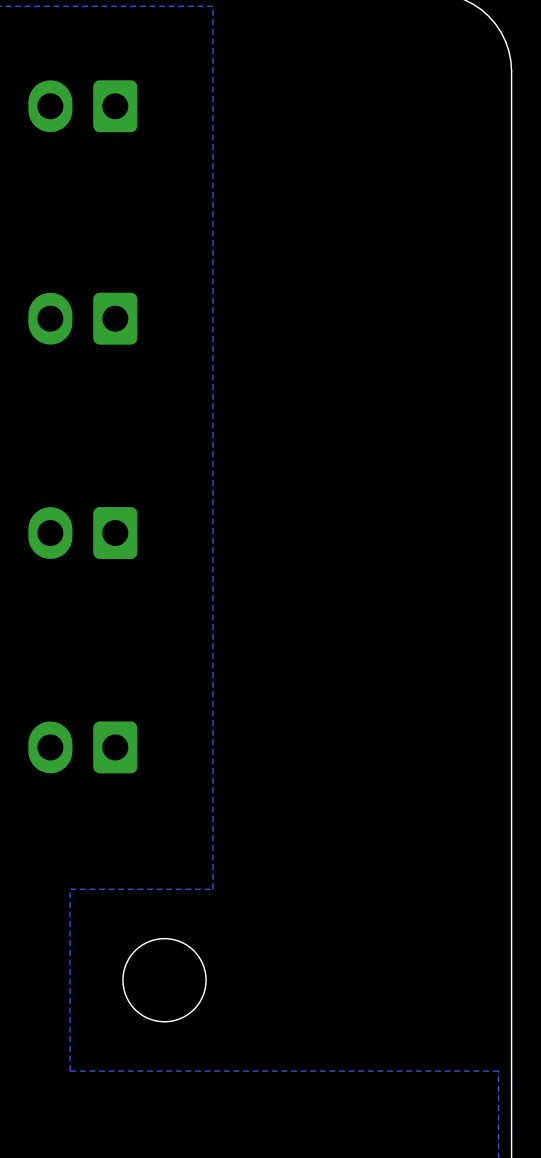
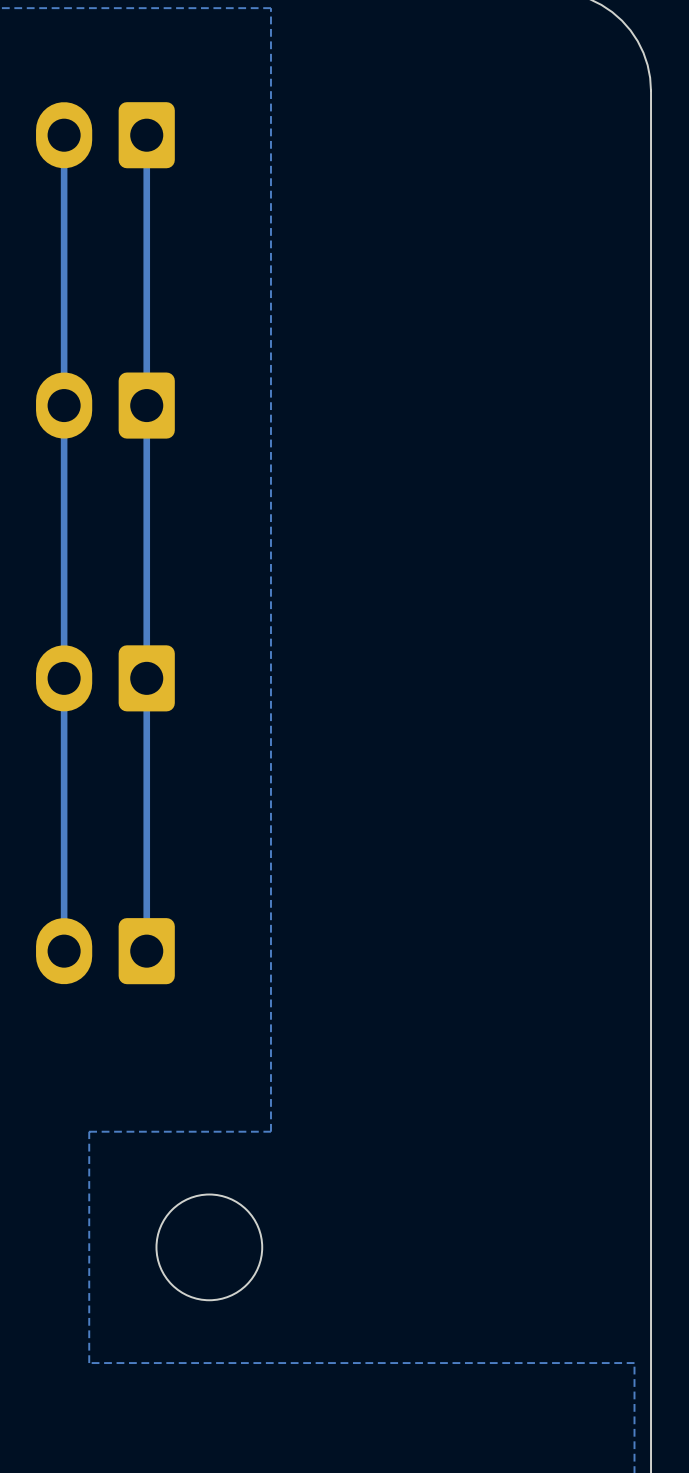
track: none -> (64, 135) (64, 951)
track: none -> (146, 135) (146, 951)

